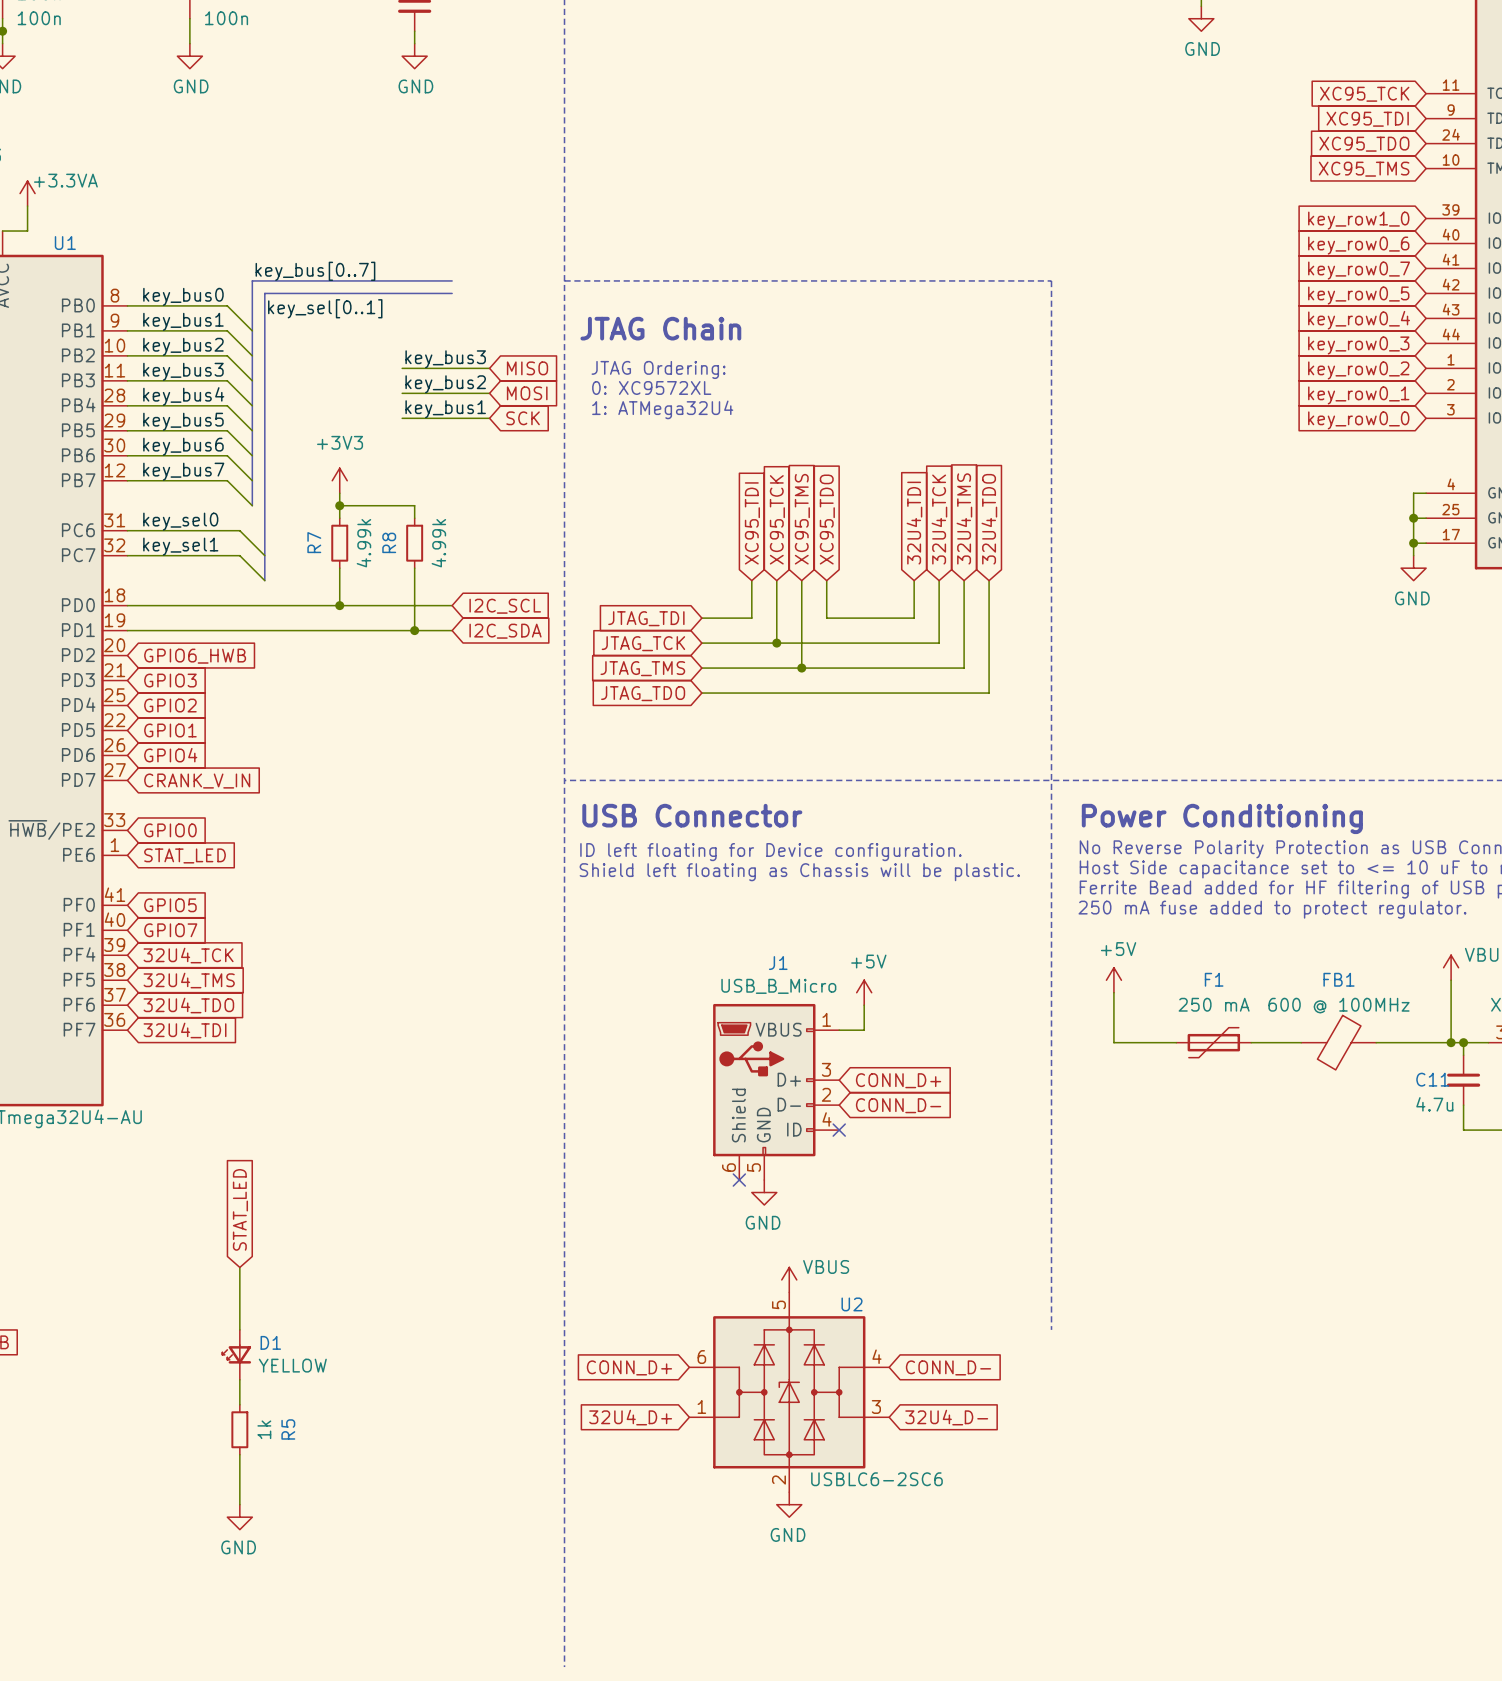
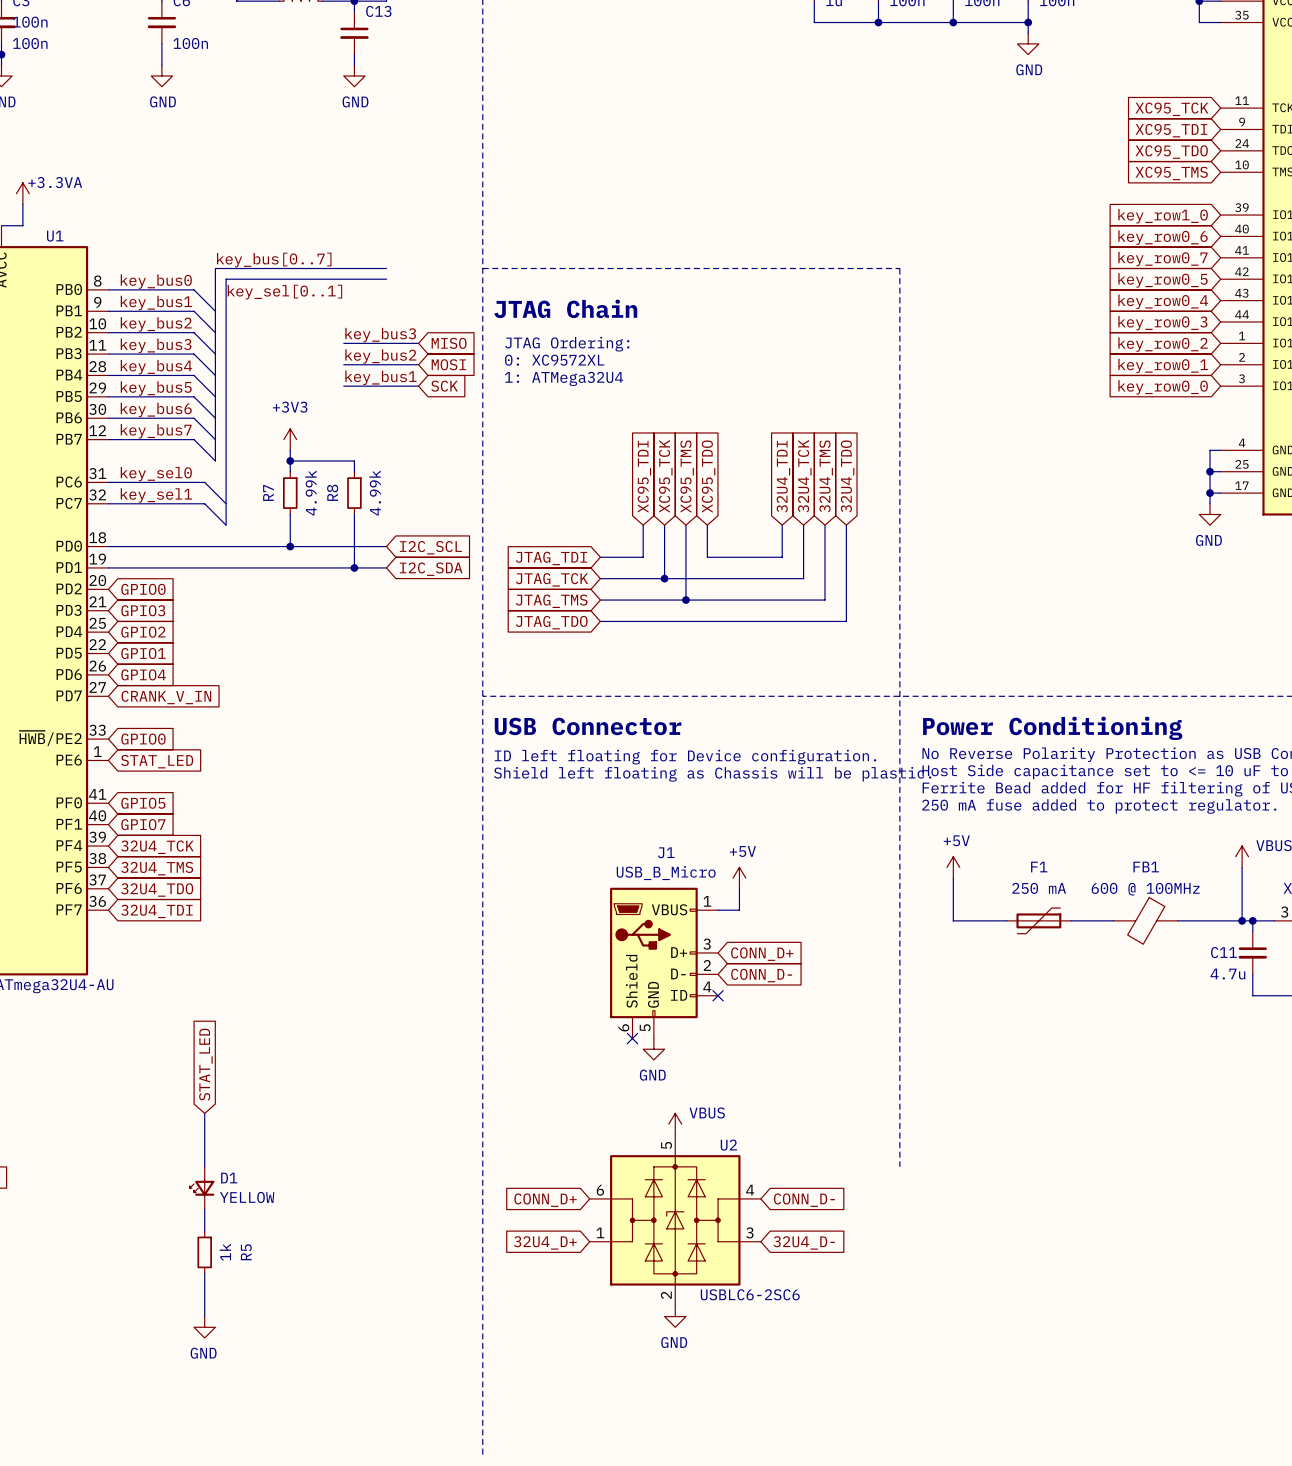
global label: GPIO6_HWB (195, 656) -> GPIO0 (143, 589)

